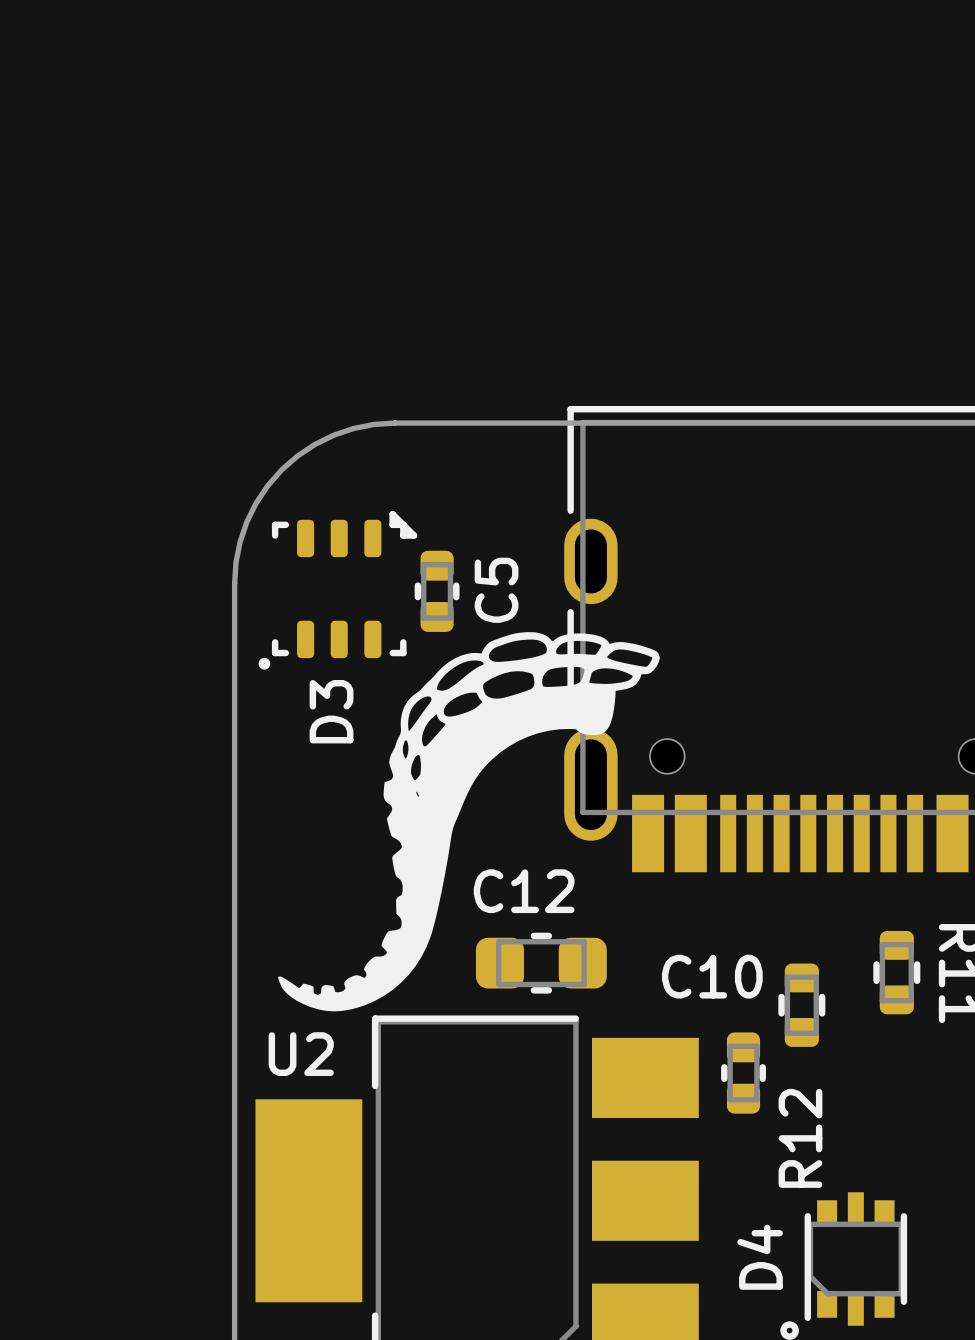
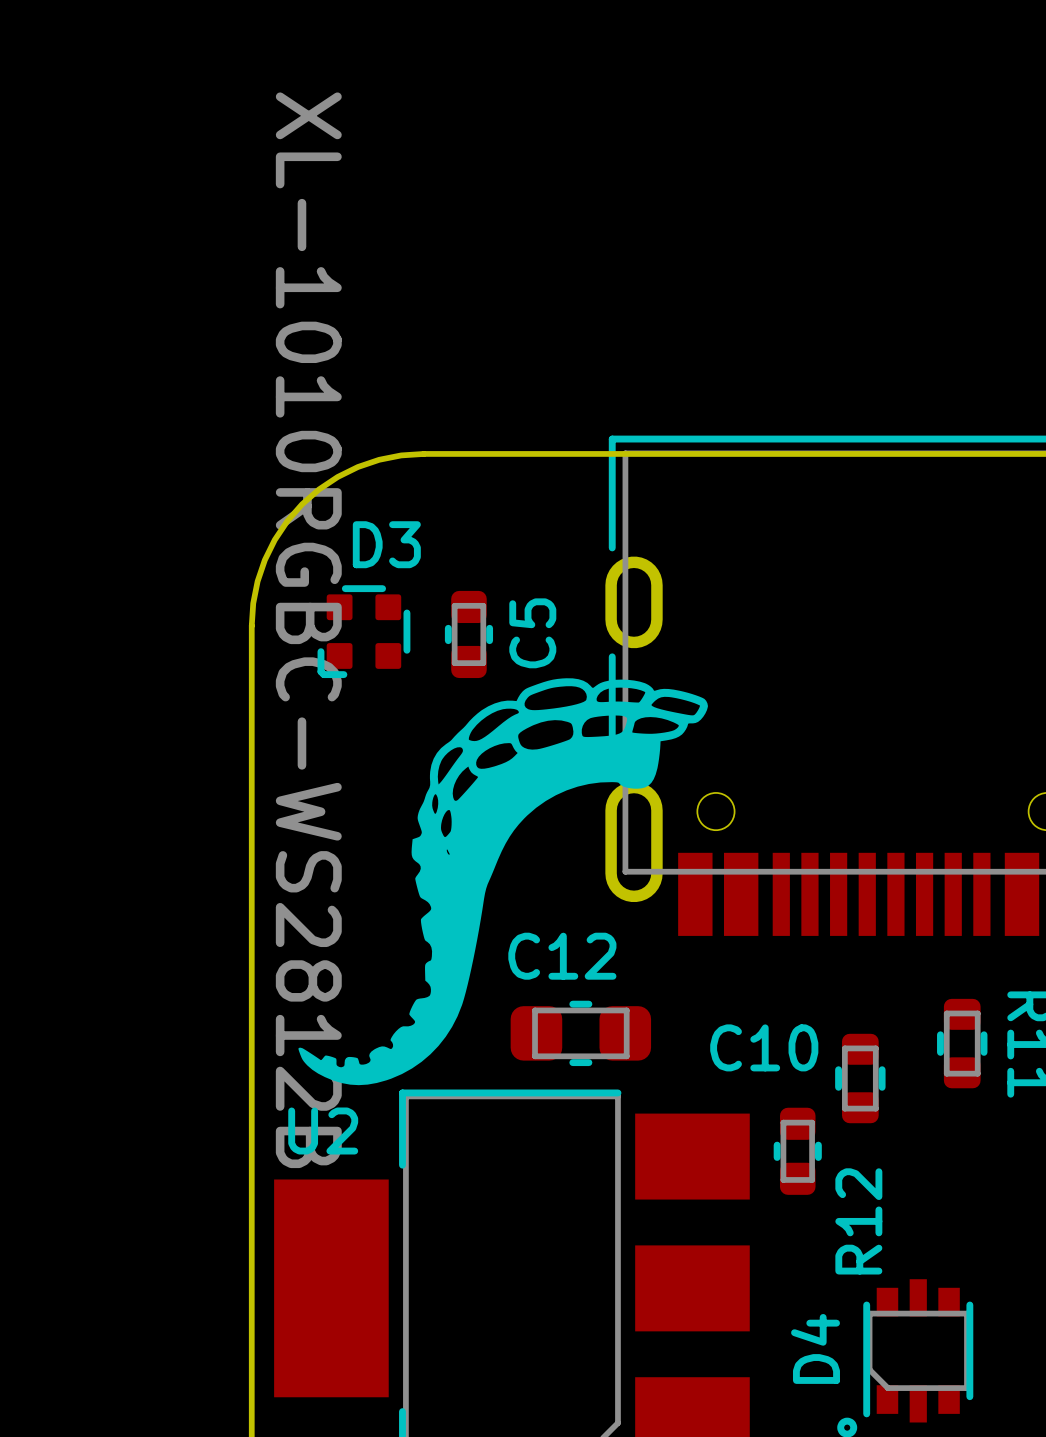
D3 footprint: [258, 510, 418, 670] -> [317, 585, 411, 679]
D3 value: none -> XL-1010RGBC-WS2812B (308, 630)
D3 name position: D3 (331, 711) -> D3 (386, 544)

